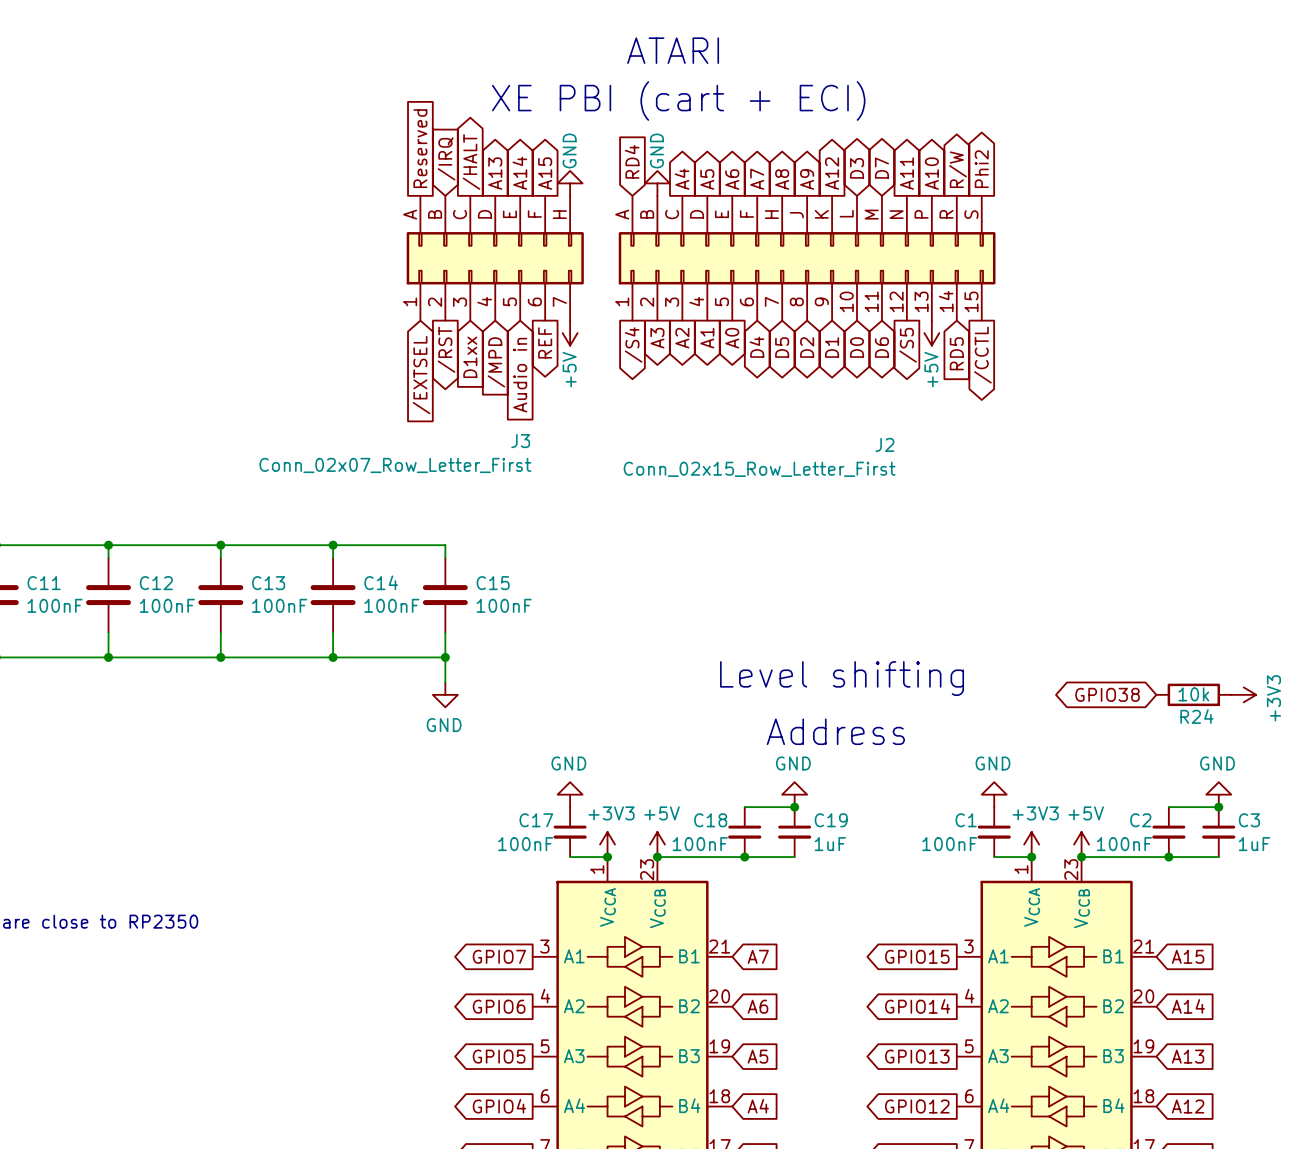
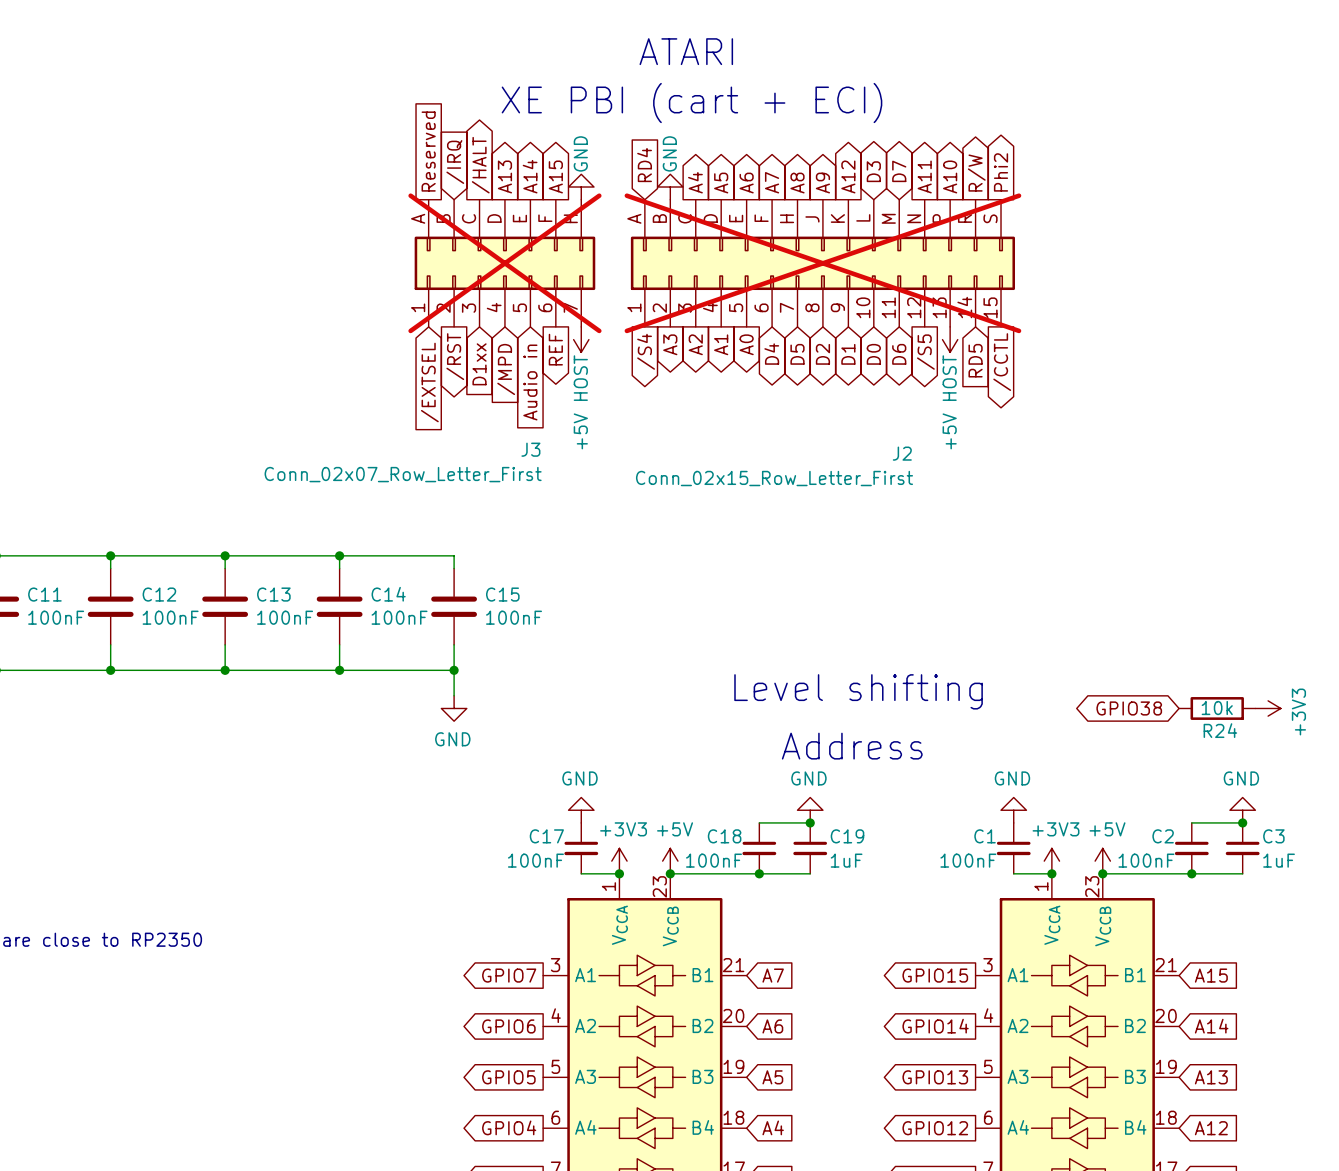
J3 do-not-place cross: none -> (504, 263)
J2 do-not-place cross: none -> (822, 263)
power symbol: +5V (570, 333) -> +5V HOST (581, 339)
power symbol: +5V (931, 333) -> +5V HOST (950, 339)

